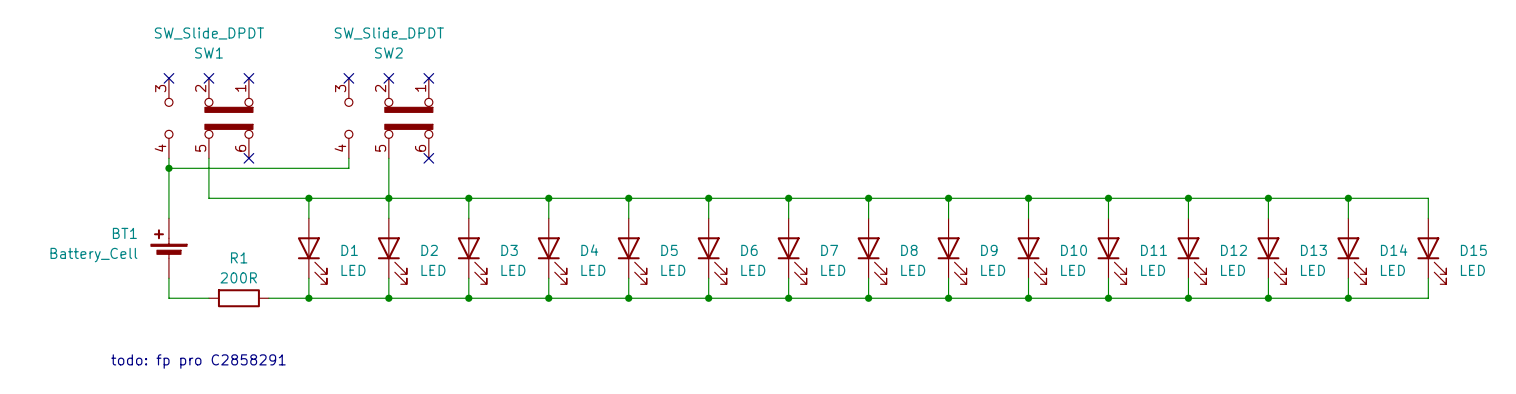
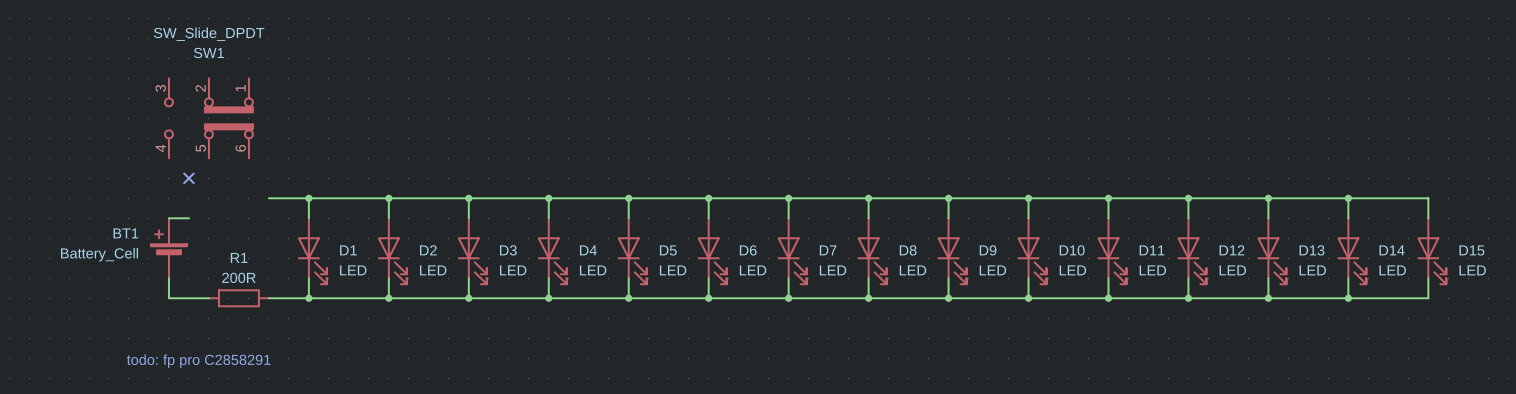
no-connect mark: (168, 78) -> none
no-connect mark: (208, 78) -> none
no-connect mark: (248, 78) -> none
no-connect mark: (348, 78) -> none
no-connect mark: (388, 78) -> none
no-connect mark: (428, 78) -> none
SW2: SW_Slide_DPDT (388, 118) -> none
wire: (168, 158) (168, 218) -> (188, 218) (168, 218)
wire: (208, 158) (208, 198) (268, 198) -> none
no-connect mark: (248, 158) -> none
wire: (348, 158) (348, 168) (168, 168) -> none
wire: (388, 158) (388, 198) -> none
no-connect mark: (428, 158) -> none
junction: (168, 168) -> none
no-connect mark: none -> (188, 178)

